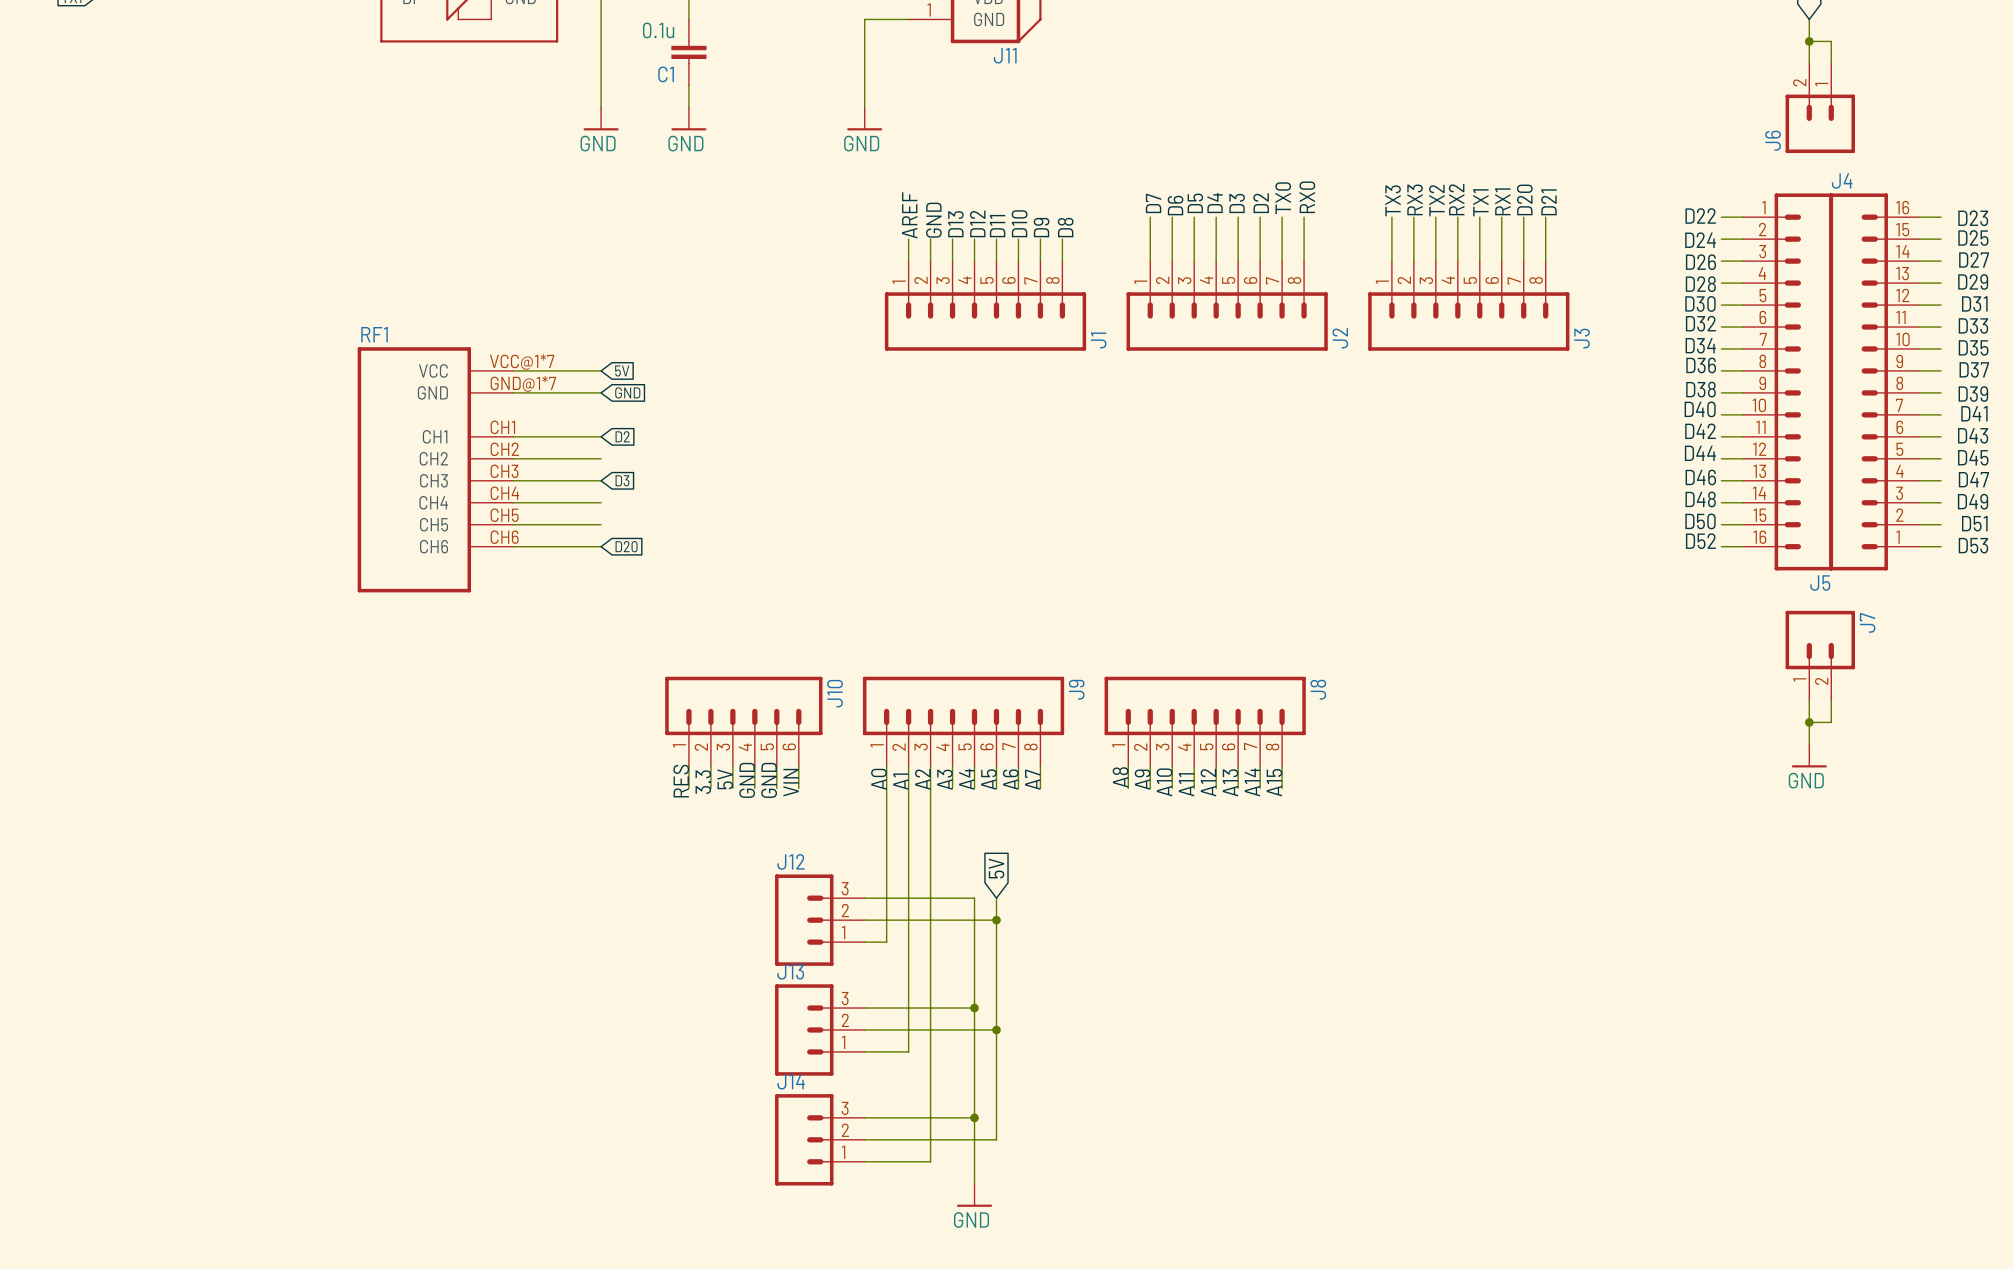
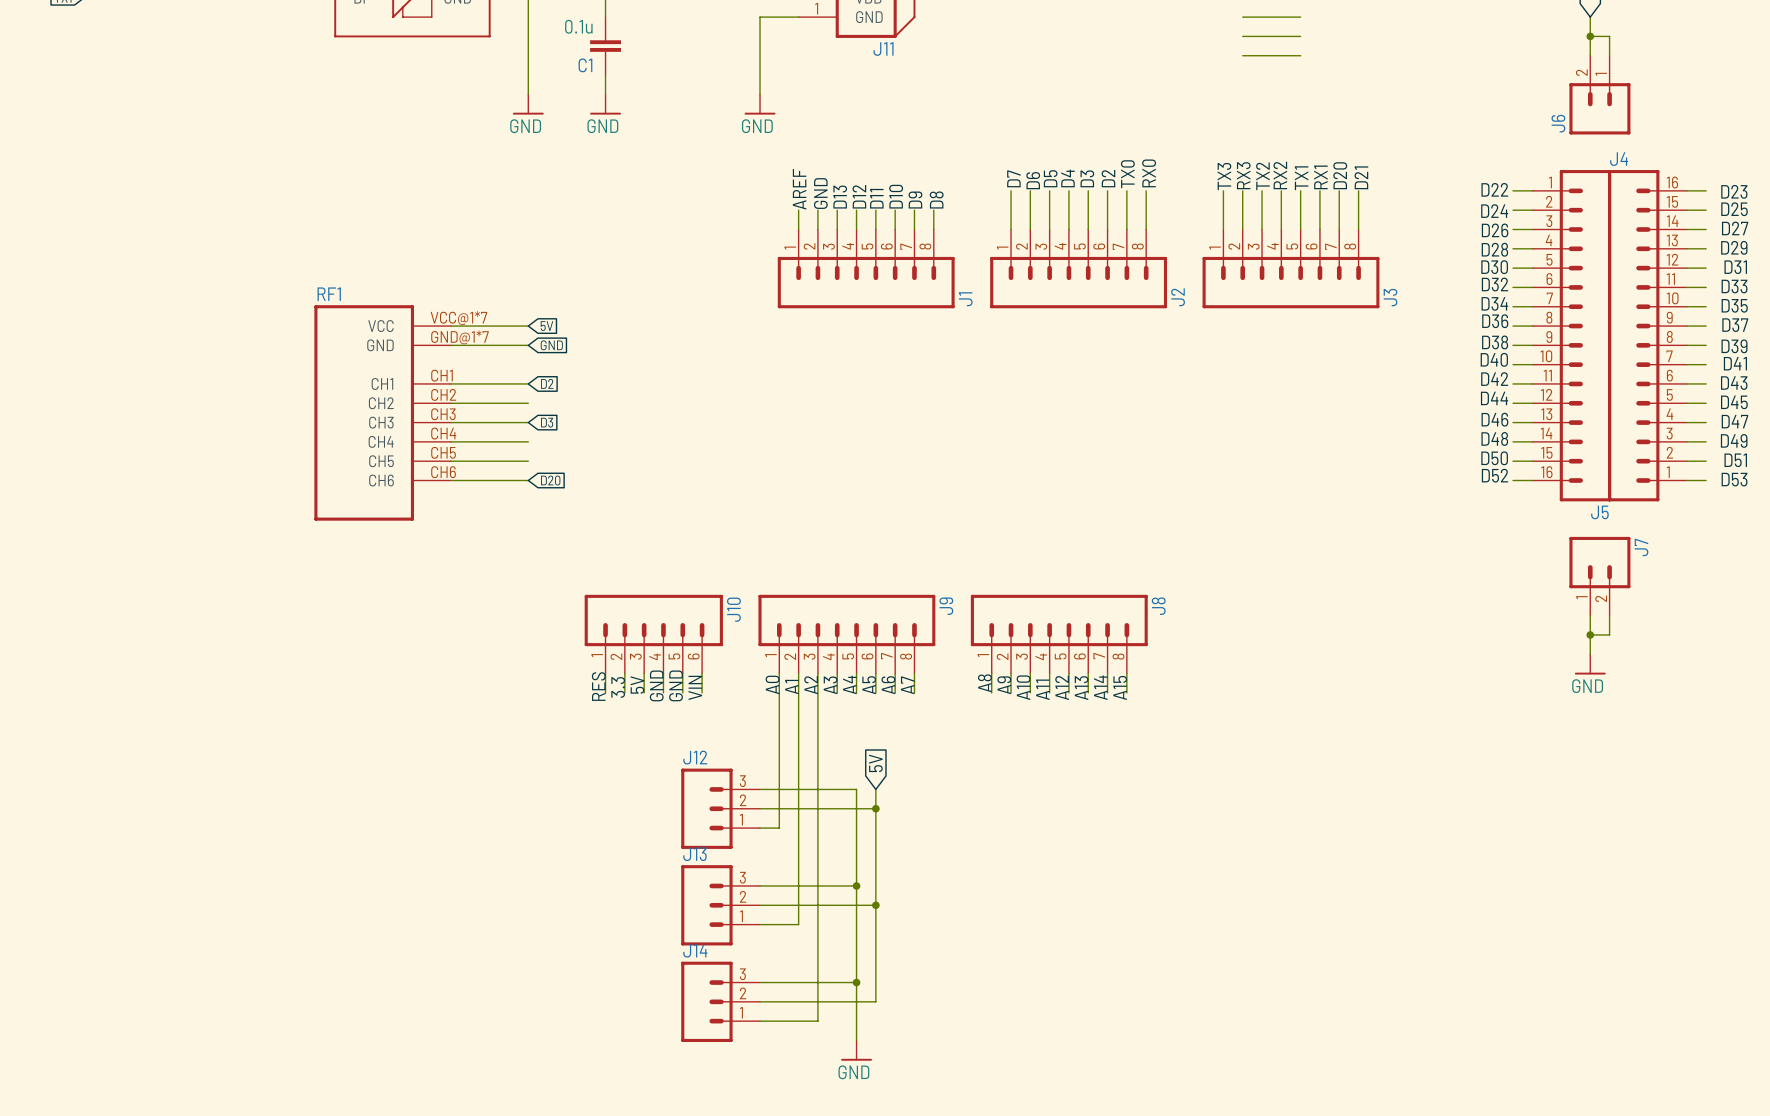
wire: none -> (1242, 17) (1300, 17)
wire: none -> (1242, 36) (1300, 36)
wire: none -> (1242, 55) (1300, 55)

